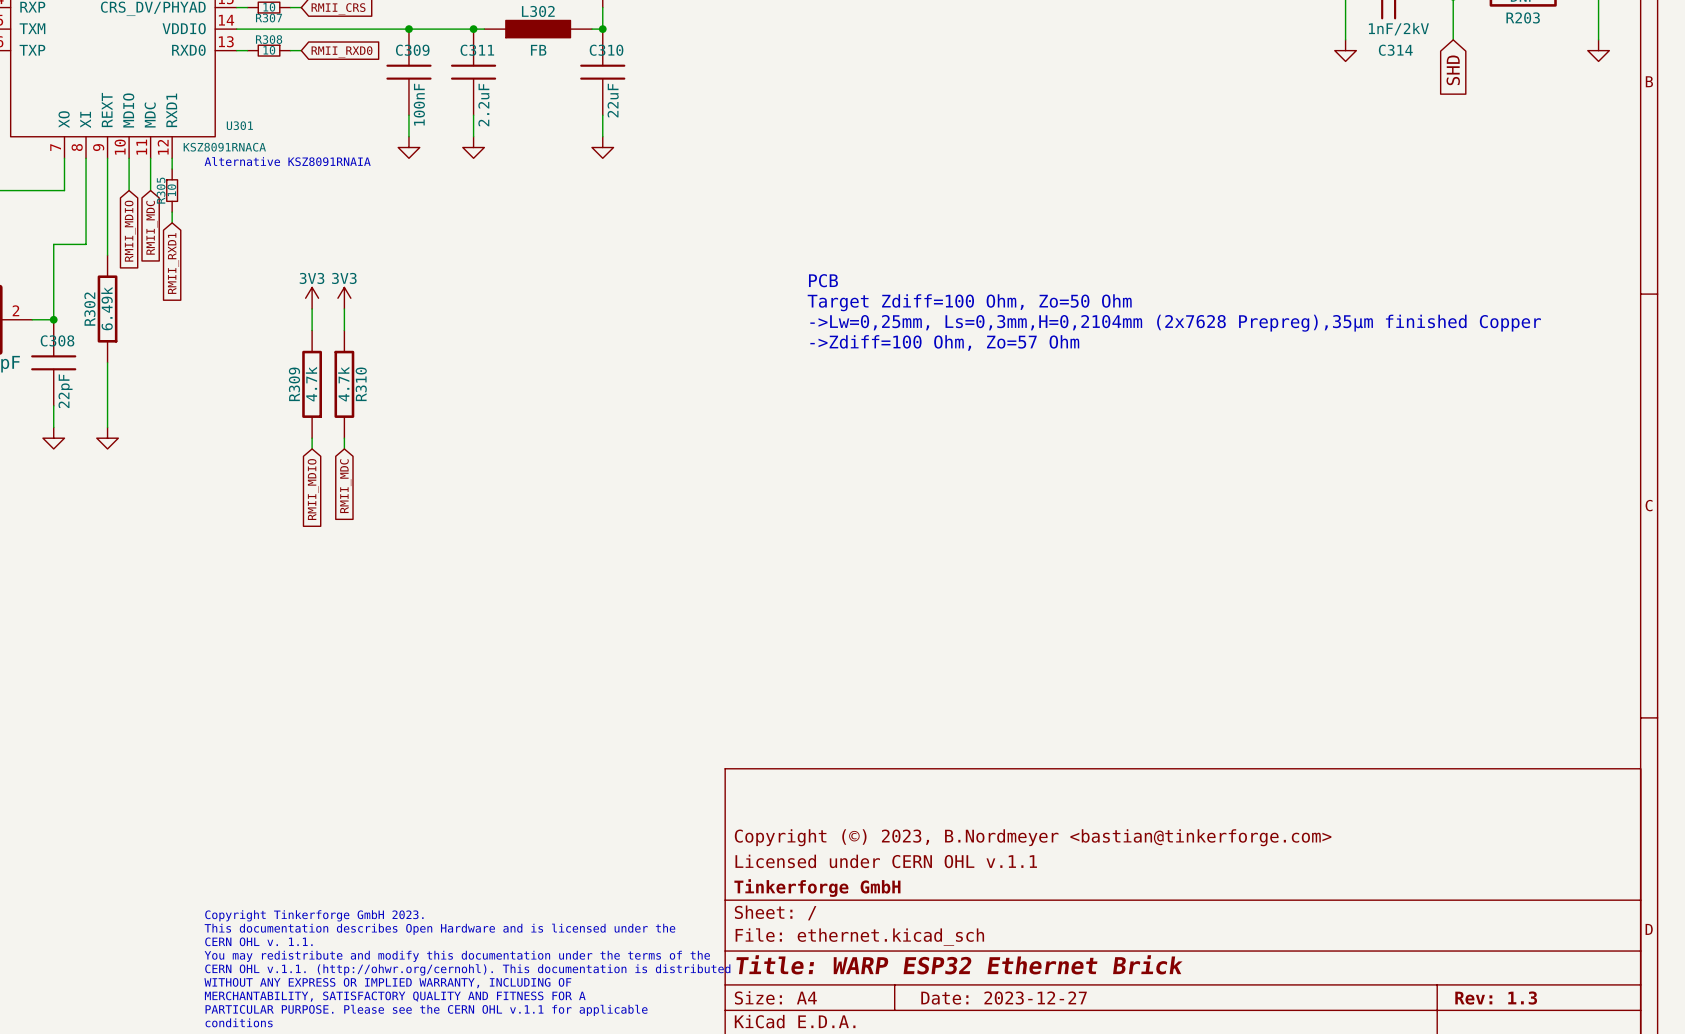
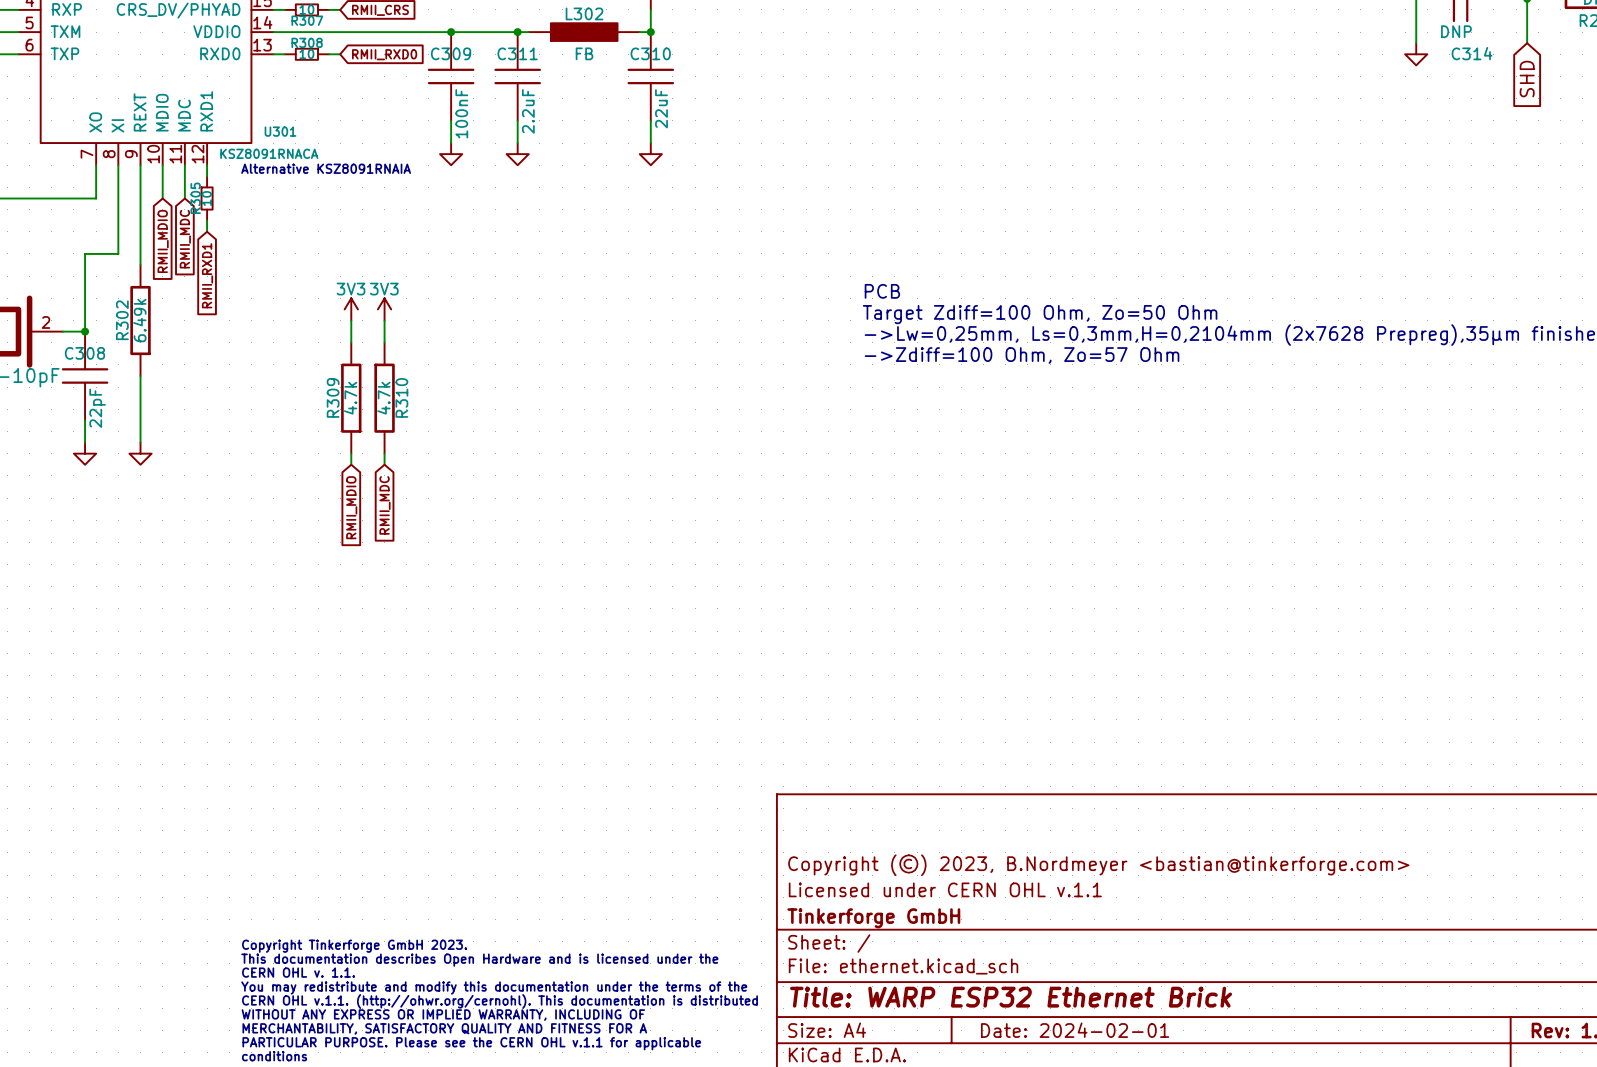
C314 value: 1nF/2kV (1398, 29) -> DNP (1456, 31)
title block: Date: 2023-12-27 (1004, 998) -> Date: 2024-02-01 (1075, 1030)

